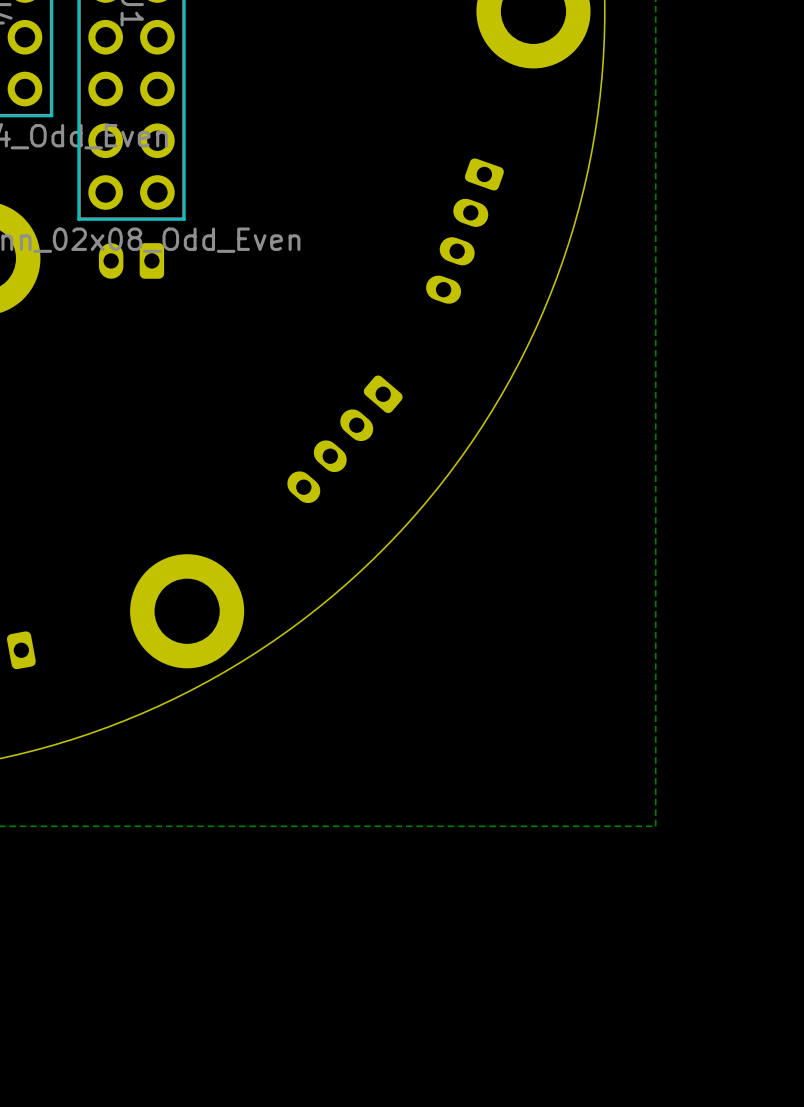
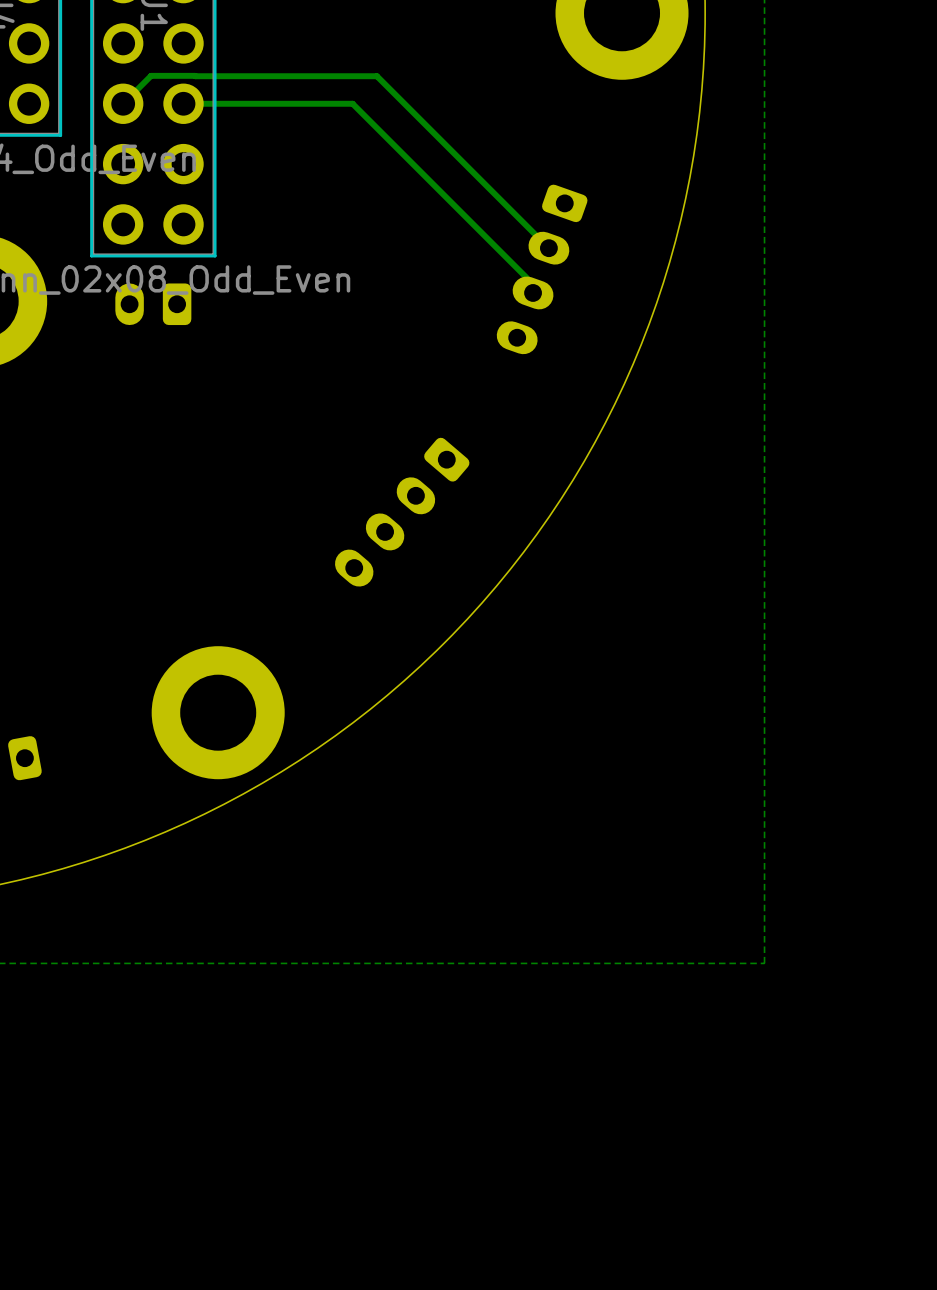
track: none -> (123, 103) (151, 75) (376, 76) (548, 248)
track: none -> (183, 103) (352, 103) (533, 284) (533, 292)

